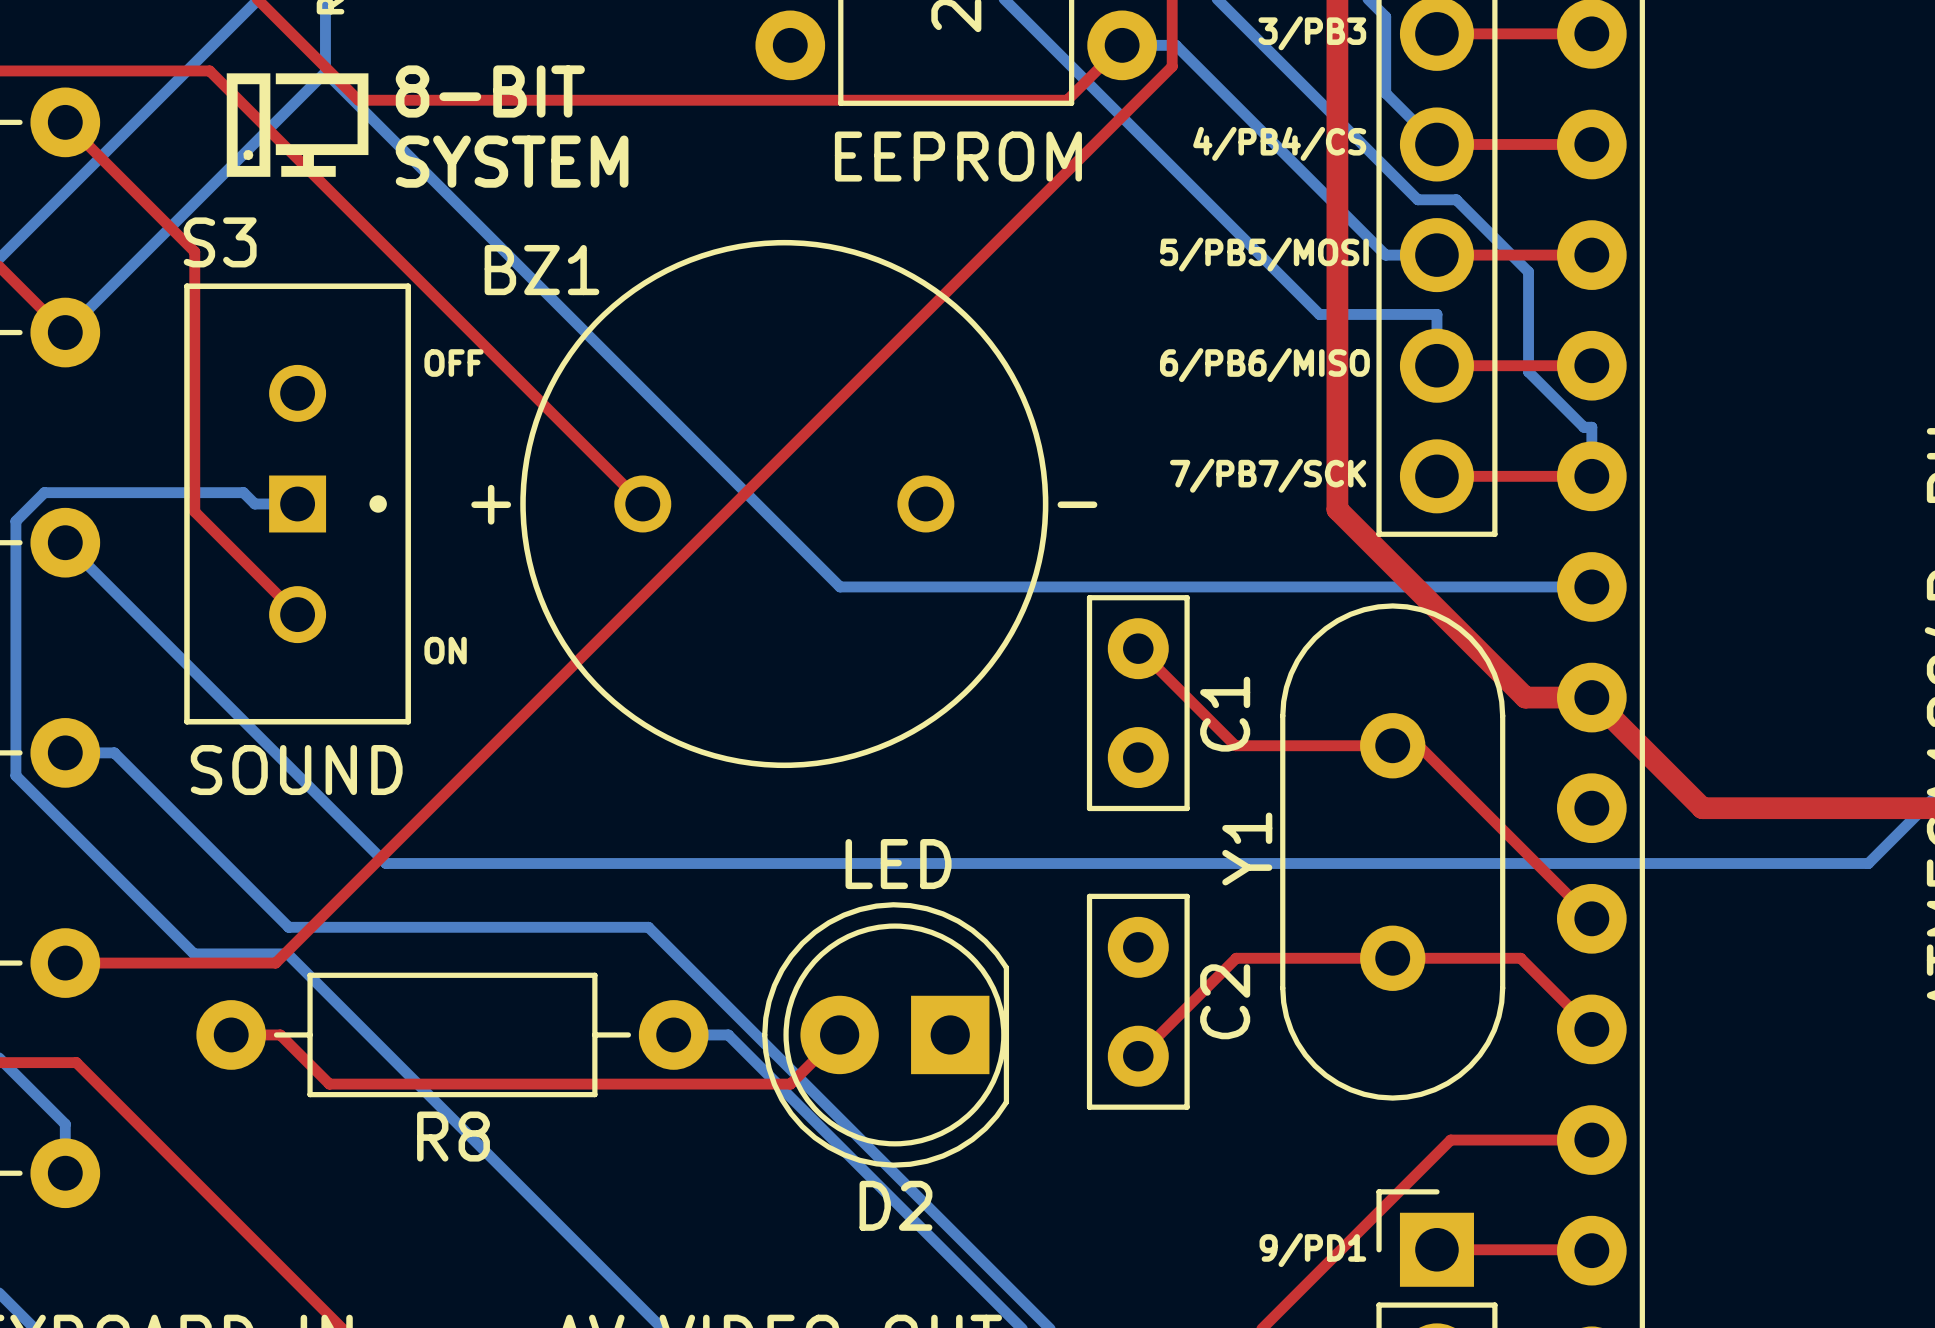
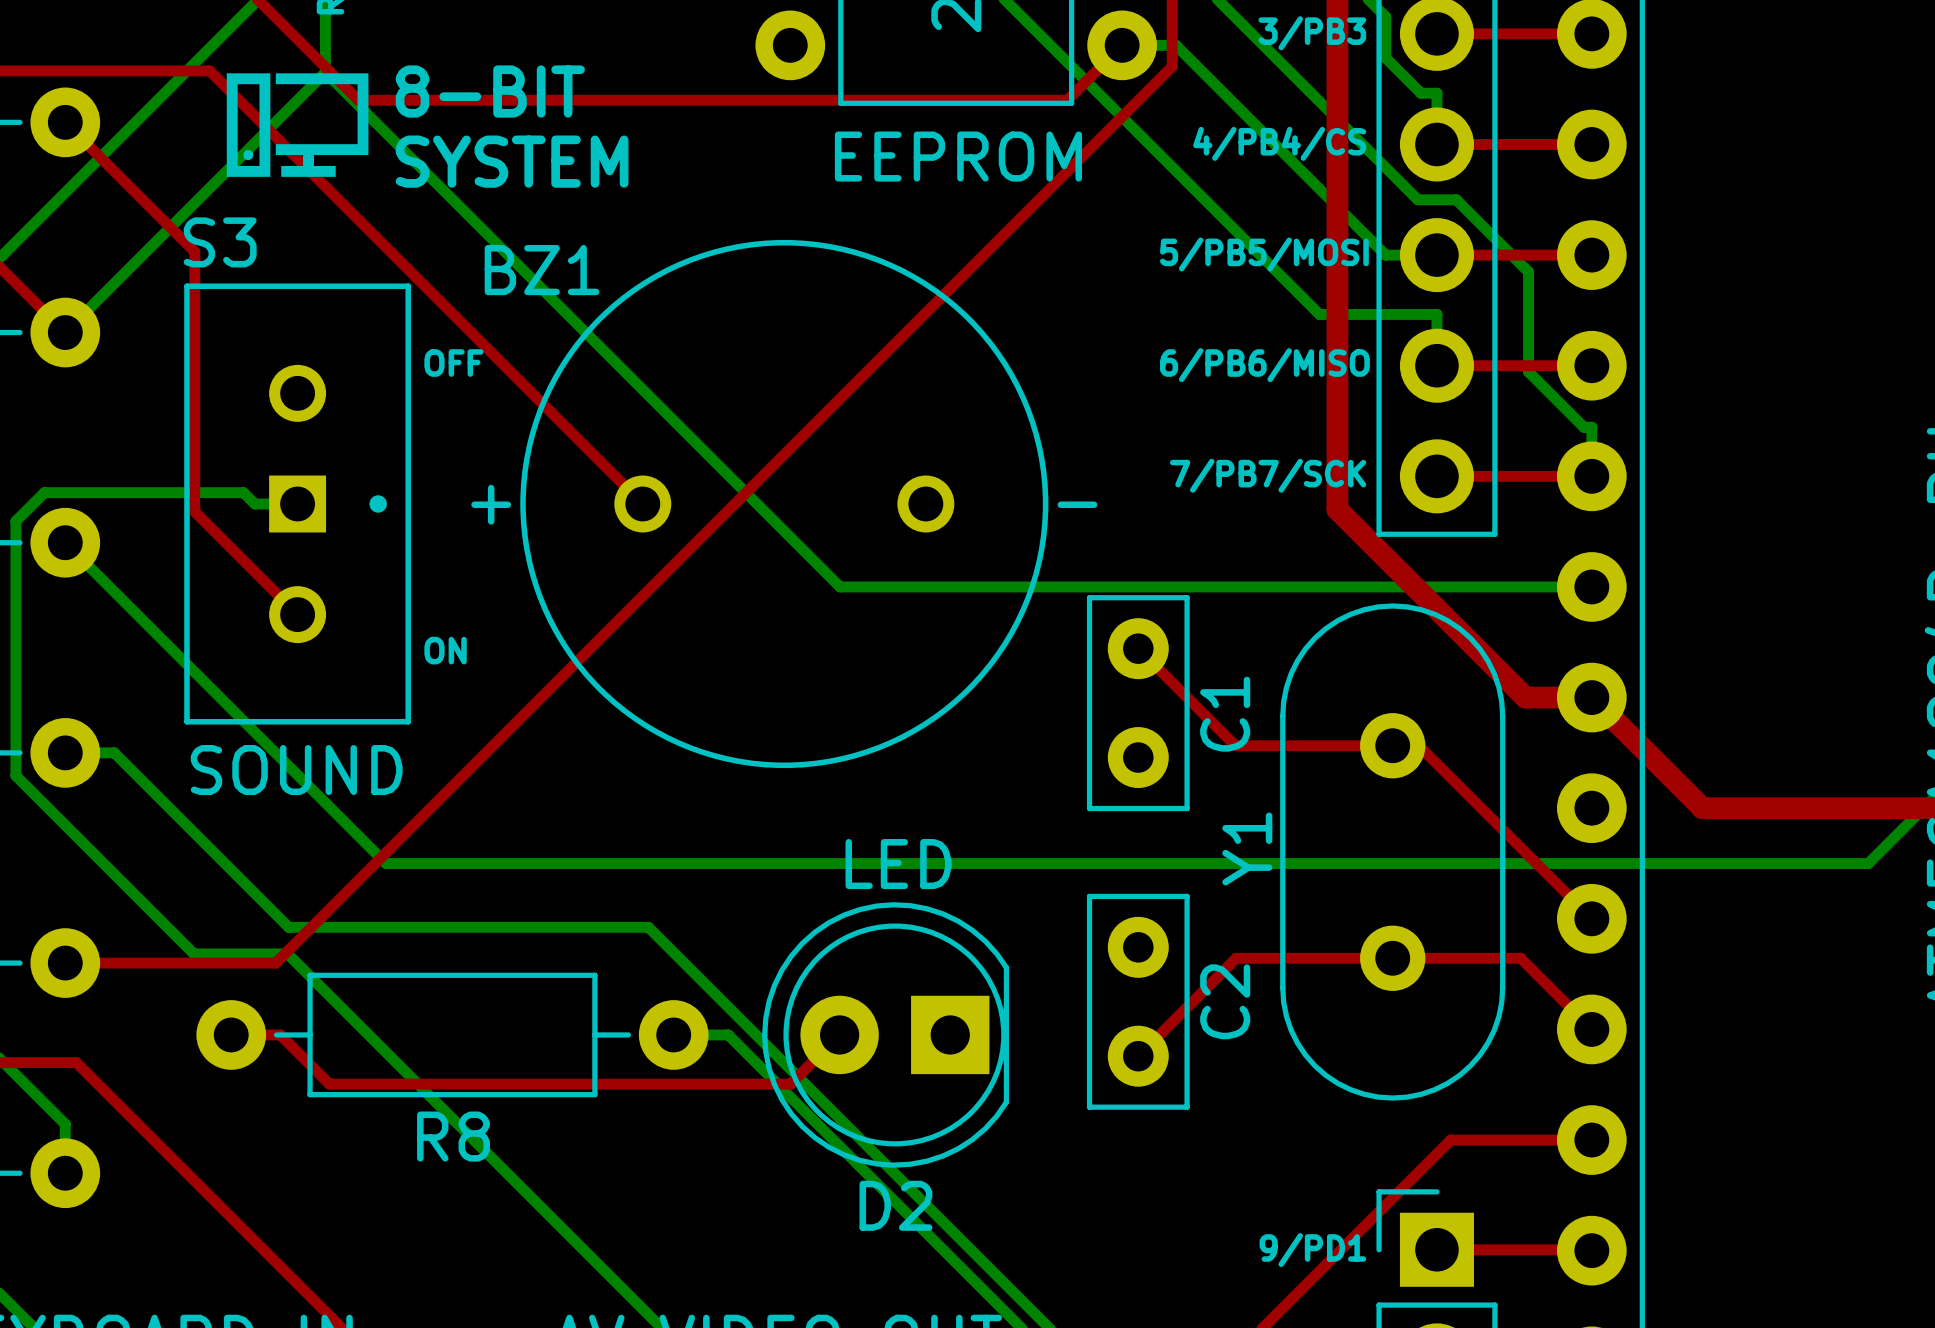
bottom track: (1385, 57) (1385, 93) (1436, 144) -> (1385, 57) (1420, 93) (1436, 93) (1436, 144)

